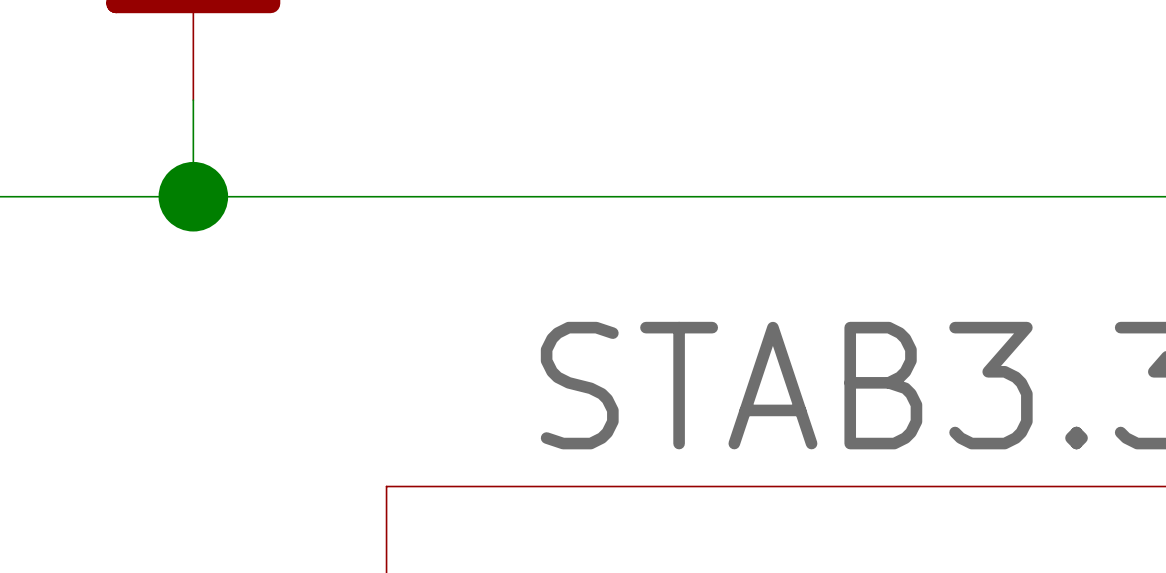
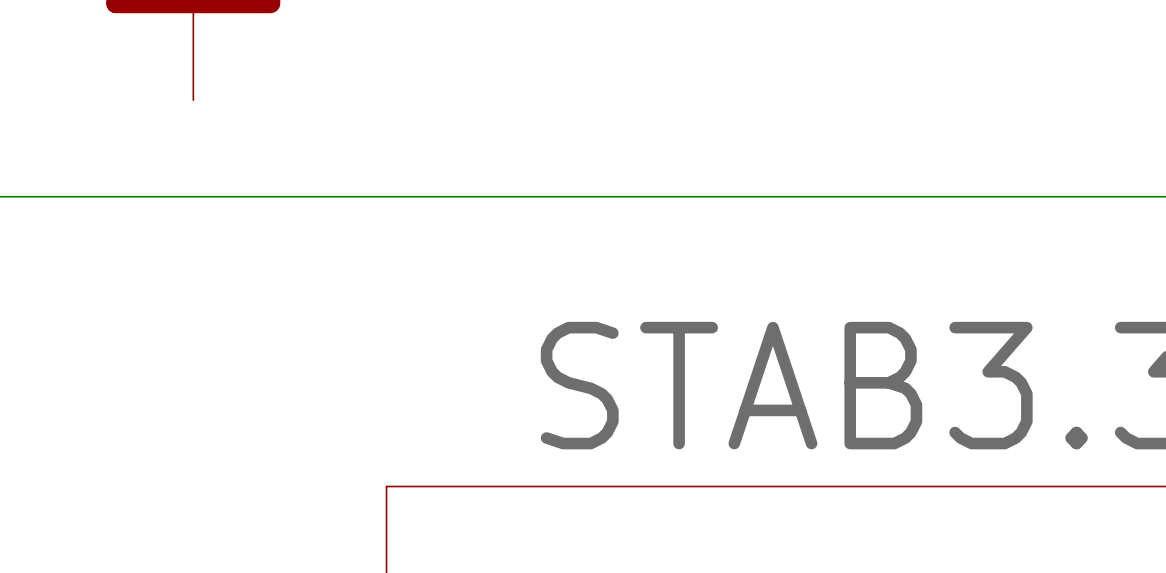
wire: (193, 100) (193, 196) -> none
junction: (193, 196) -> none

